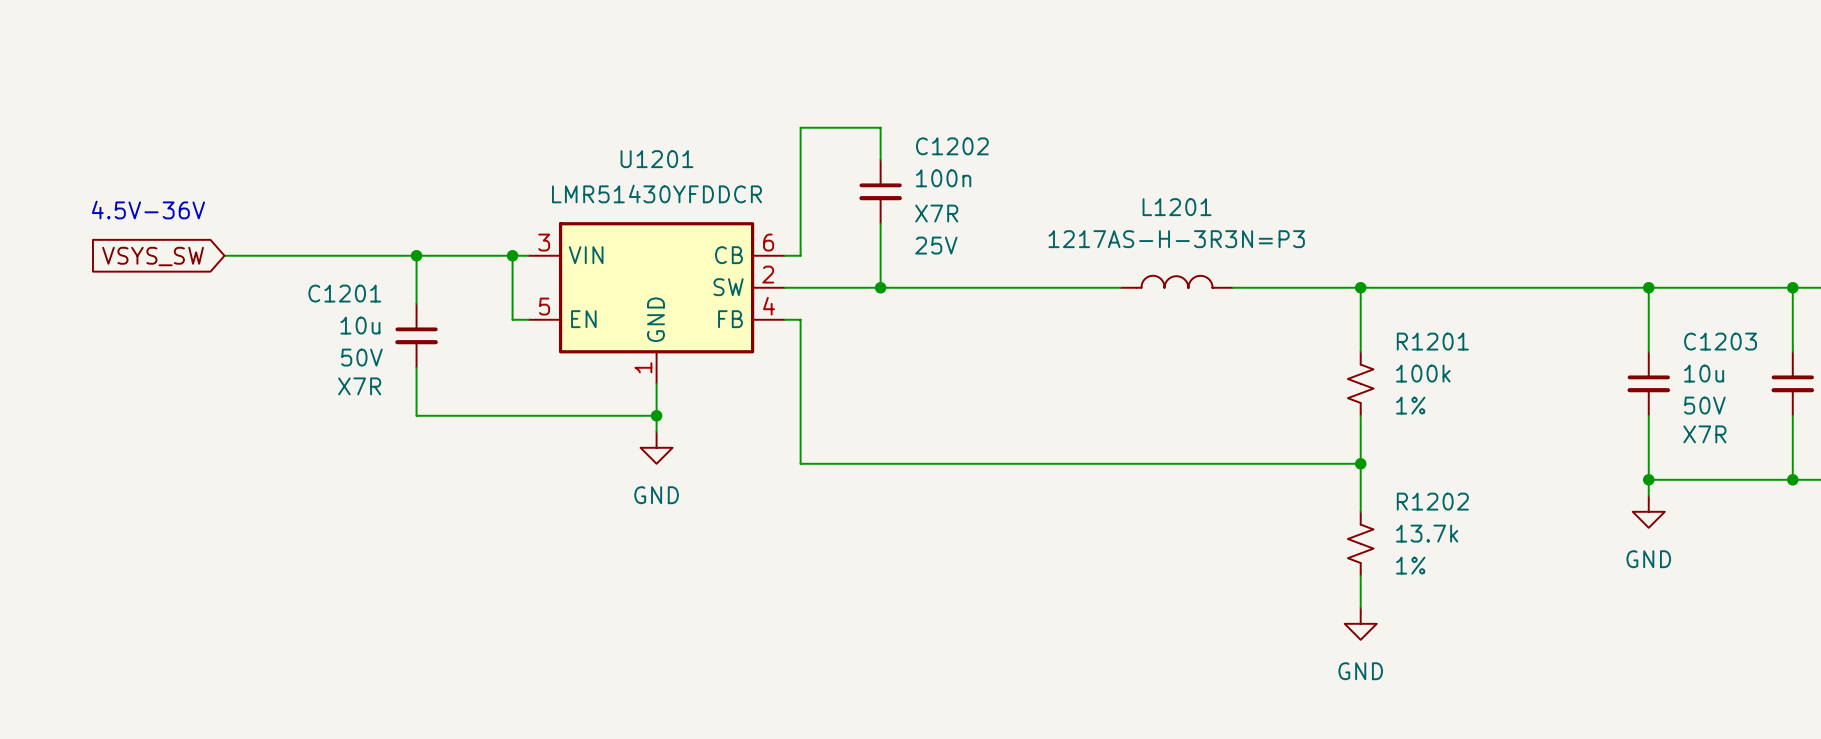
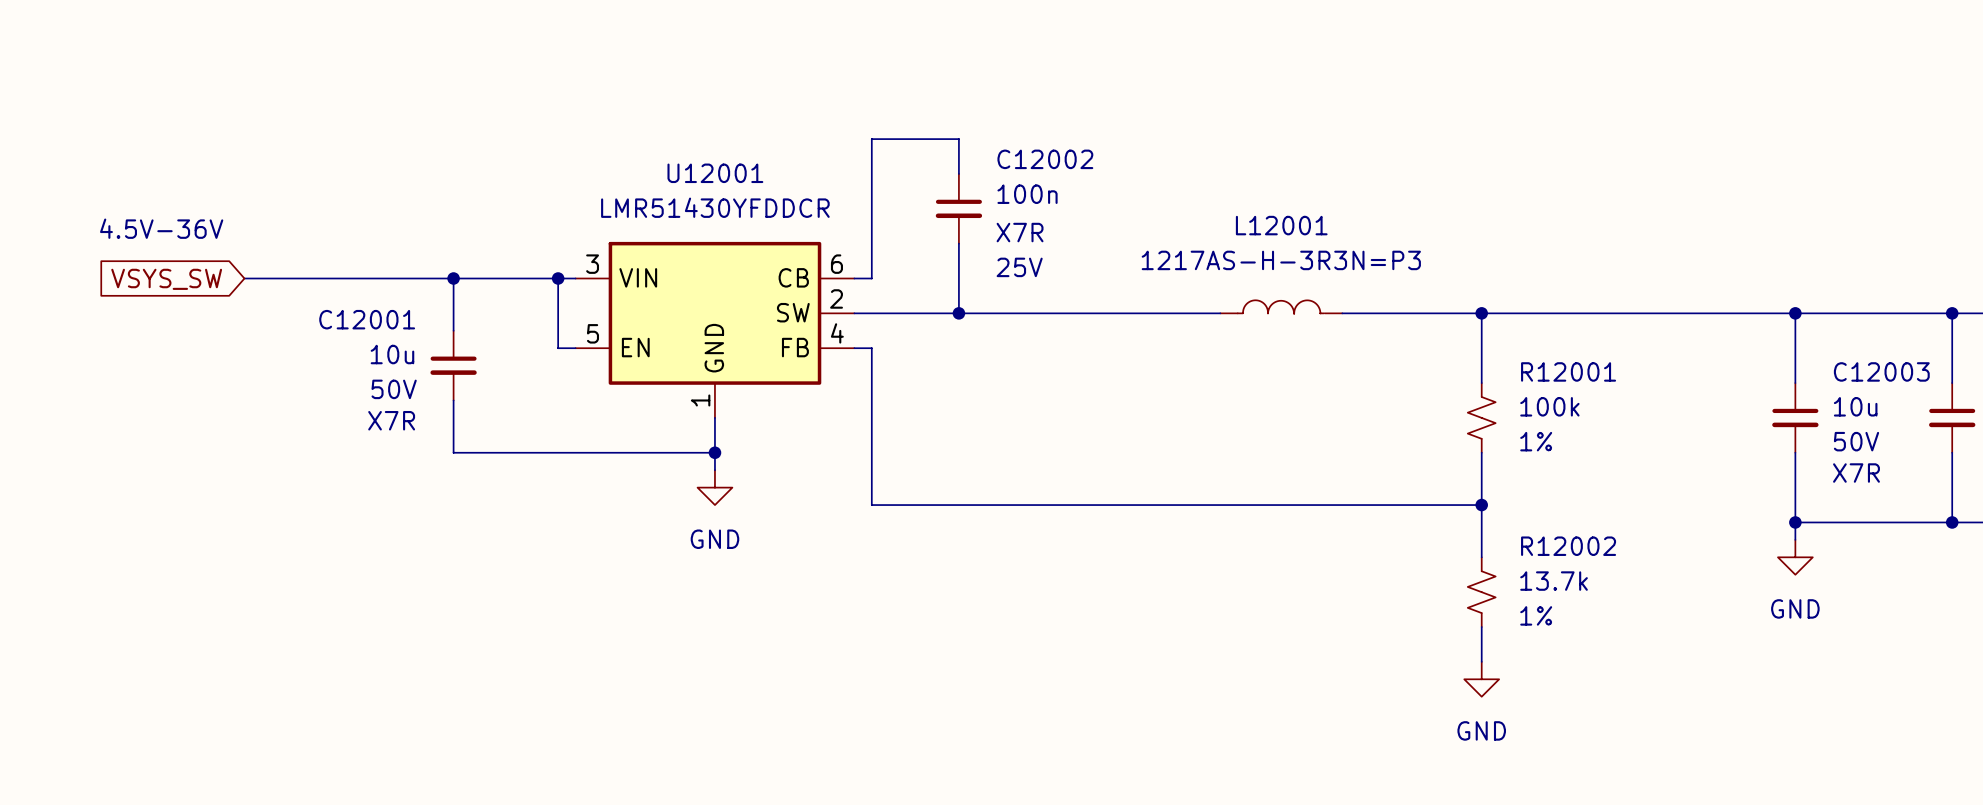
C1202 name: C1202 (952, 146) -> C12002 (1045, 159)
U1201 name: U1201 (656, 159) -> U12001 (715, 173)
U1201 value: none -> LMR51430YFDDCR (715, 207)
U1201 text: LMR51430YFDDCR (656, 193) -> none
L1201 name: L1201 (1177, 207) -> L12001 (1281, 225)
C1201 name: C1201 (344, 293) -> C12001 (367, 319)
R1201 name: R1201 (1432, 341) -> R12001 (1568, 371)
C1203 name: C1203 (1720, 341) -> C12003 (1881, 371)
R1202 name: R1202 (1432, 501) -> R12002 (1568, 546)

